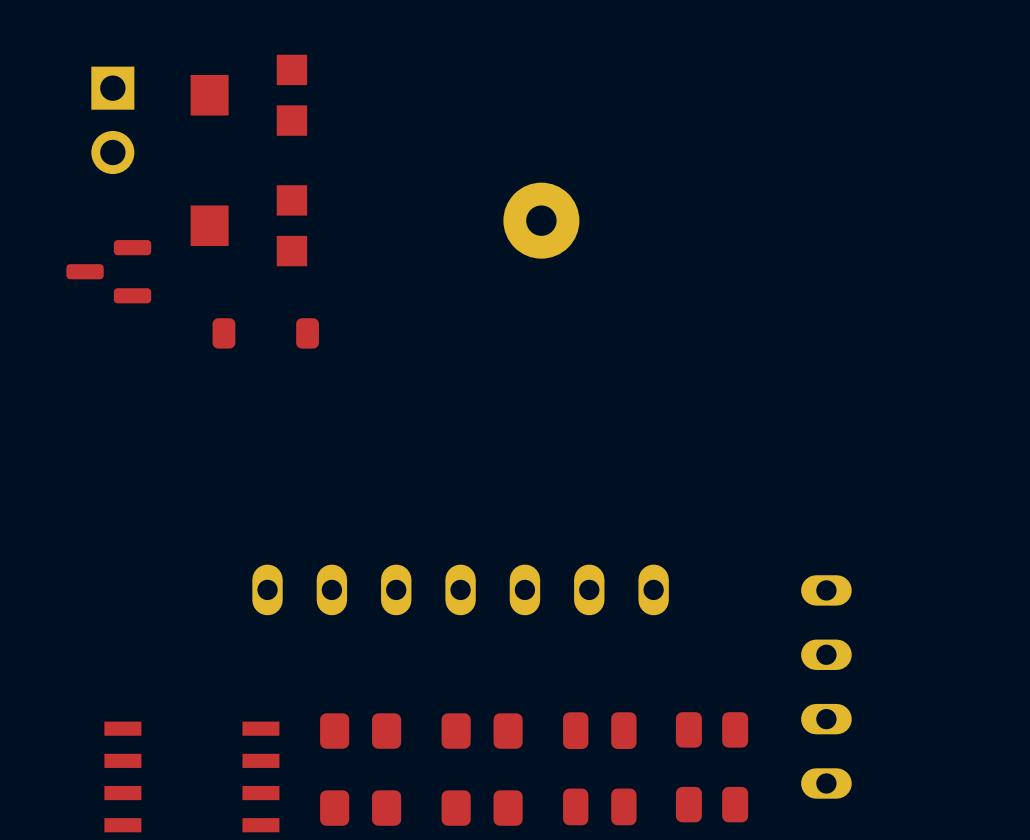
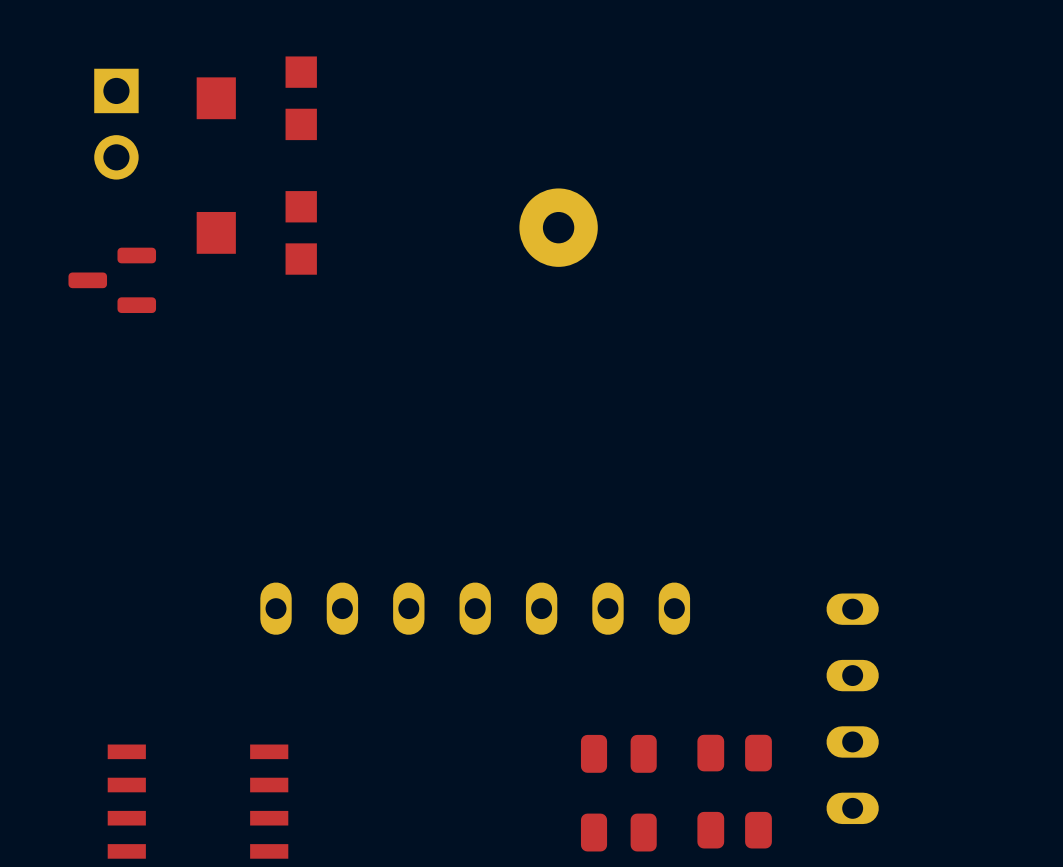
part: (265, 333) -> none
part: (360, 731) -> none
part: (482, 731) -> none
part: (360, 808) -> none
part: (482, 808) -> none

